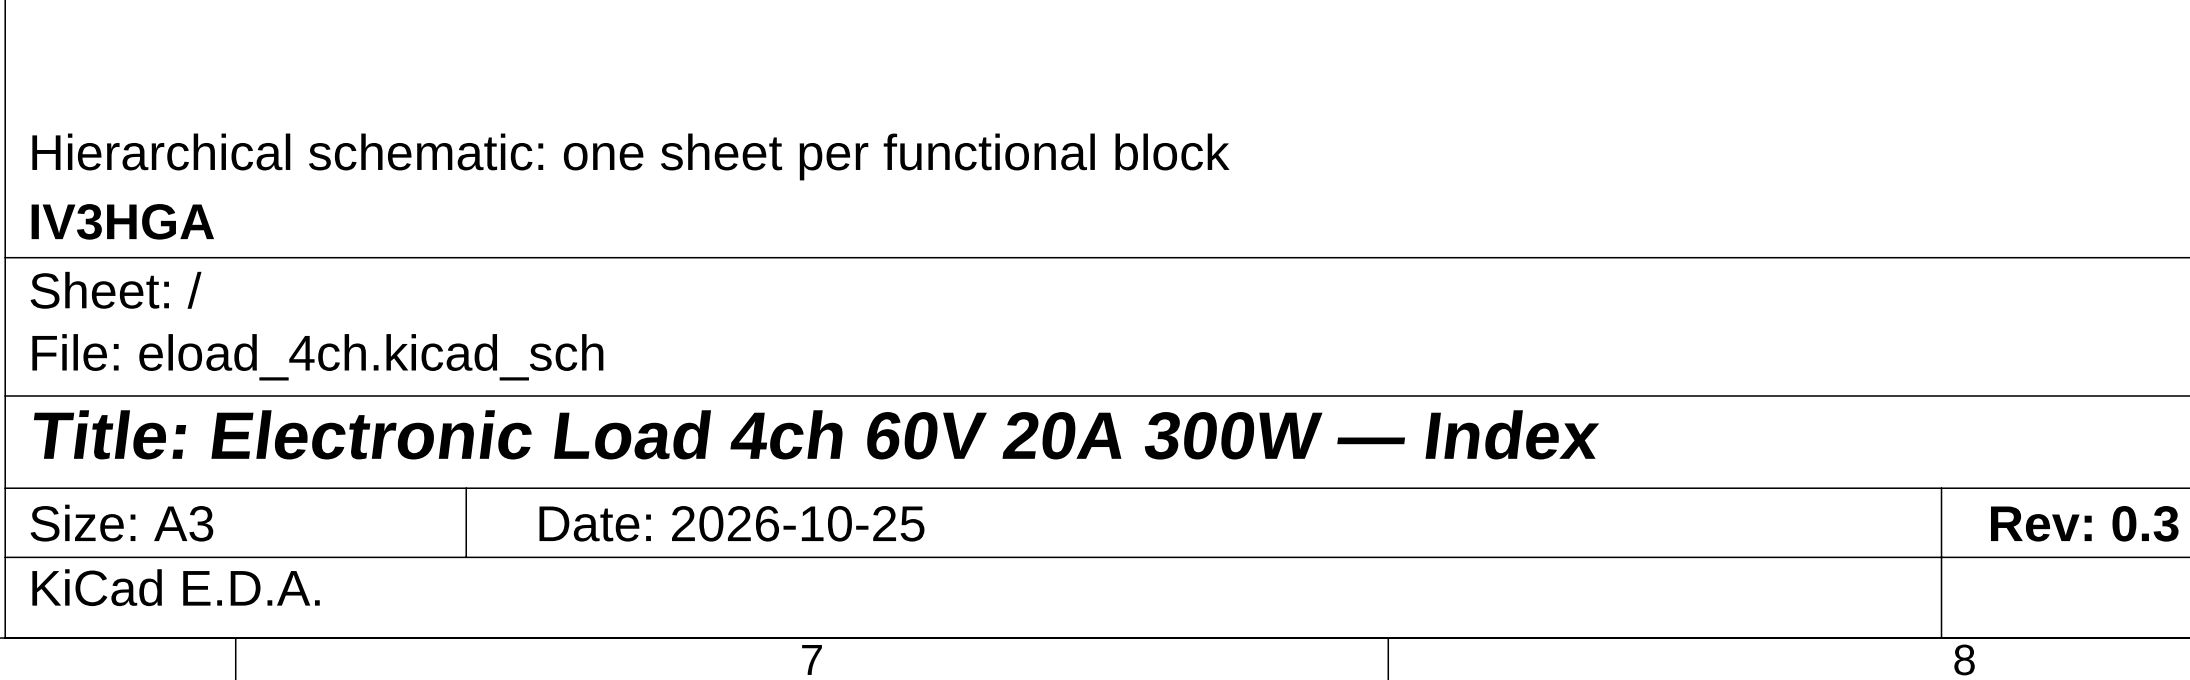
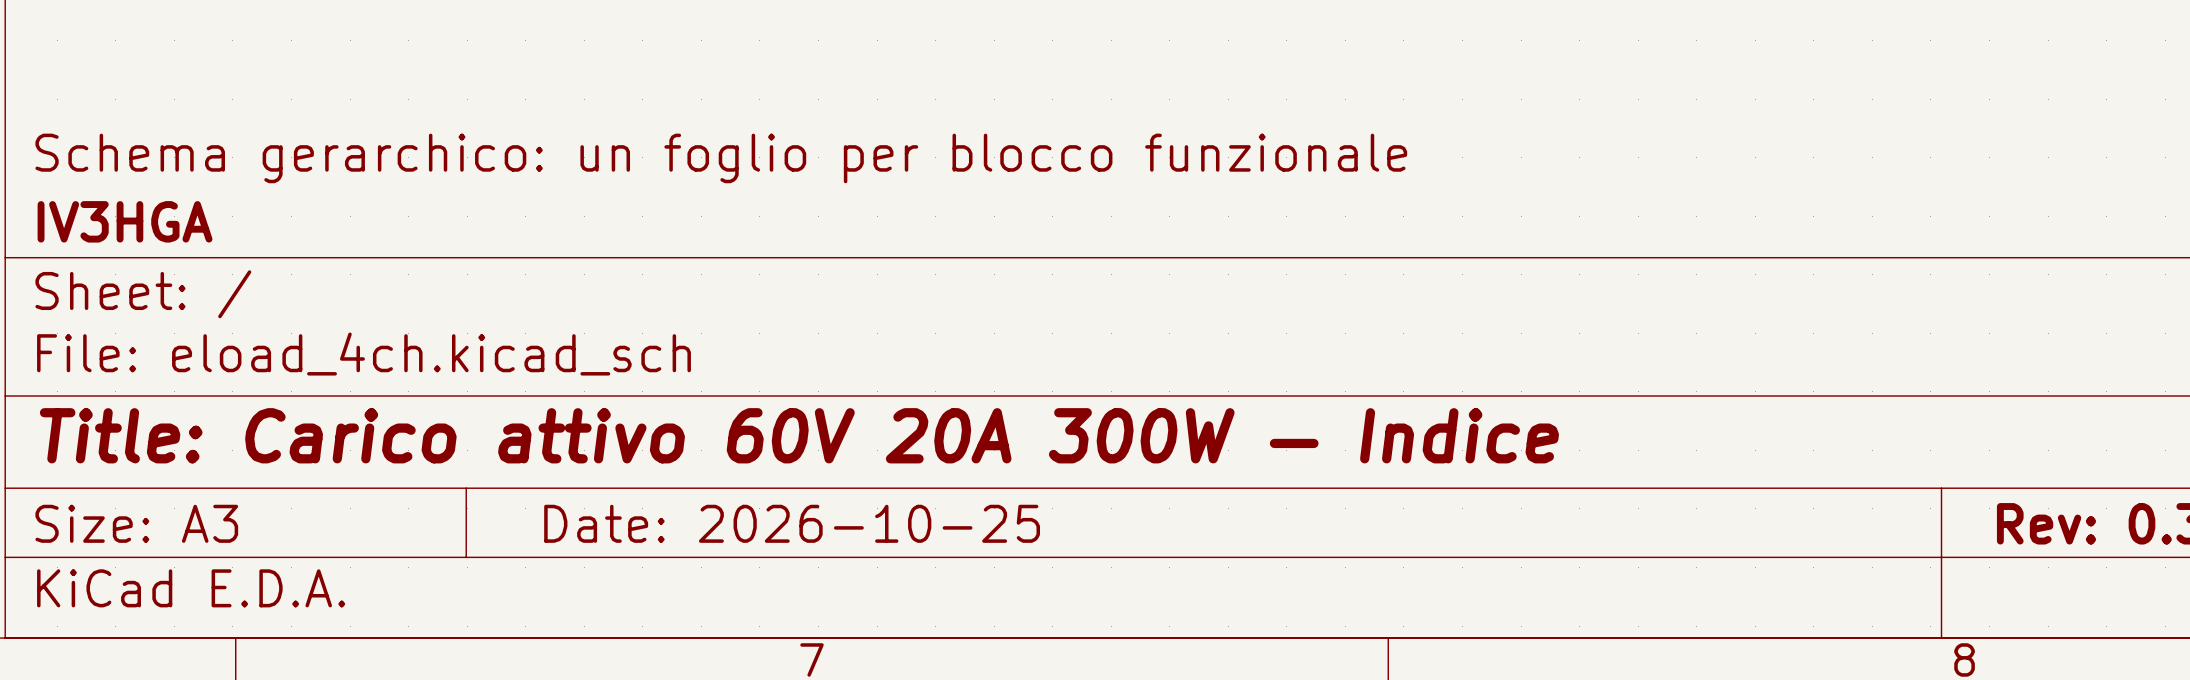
title block: Hierarchical schematic: one sheet per functional block (630, 156) -> Schema gerarchico: un foglio per blocco funzionale (721, 158)
title block: Title: Electronic Load 4ch 60V 20A 300W — Index (816, 434) -> Title: Carico attivo 60V 20A 300W — Indice (799, 435)

